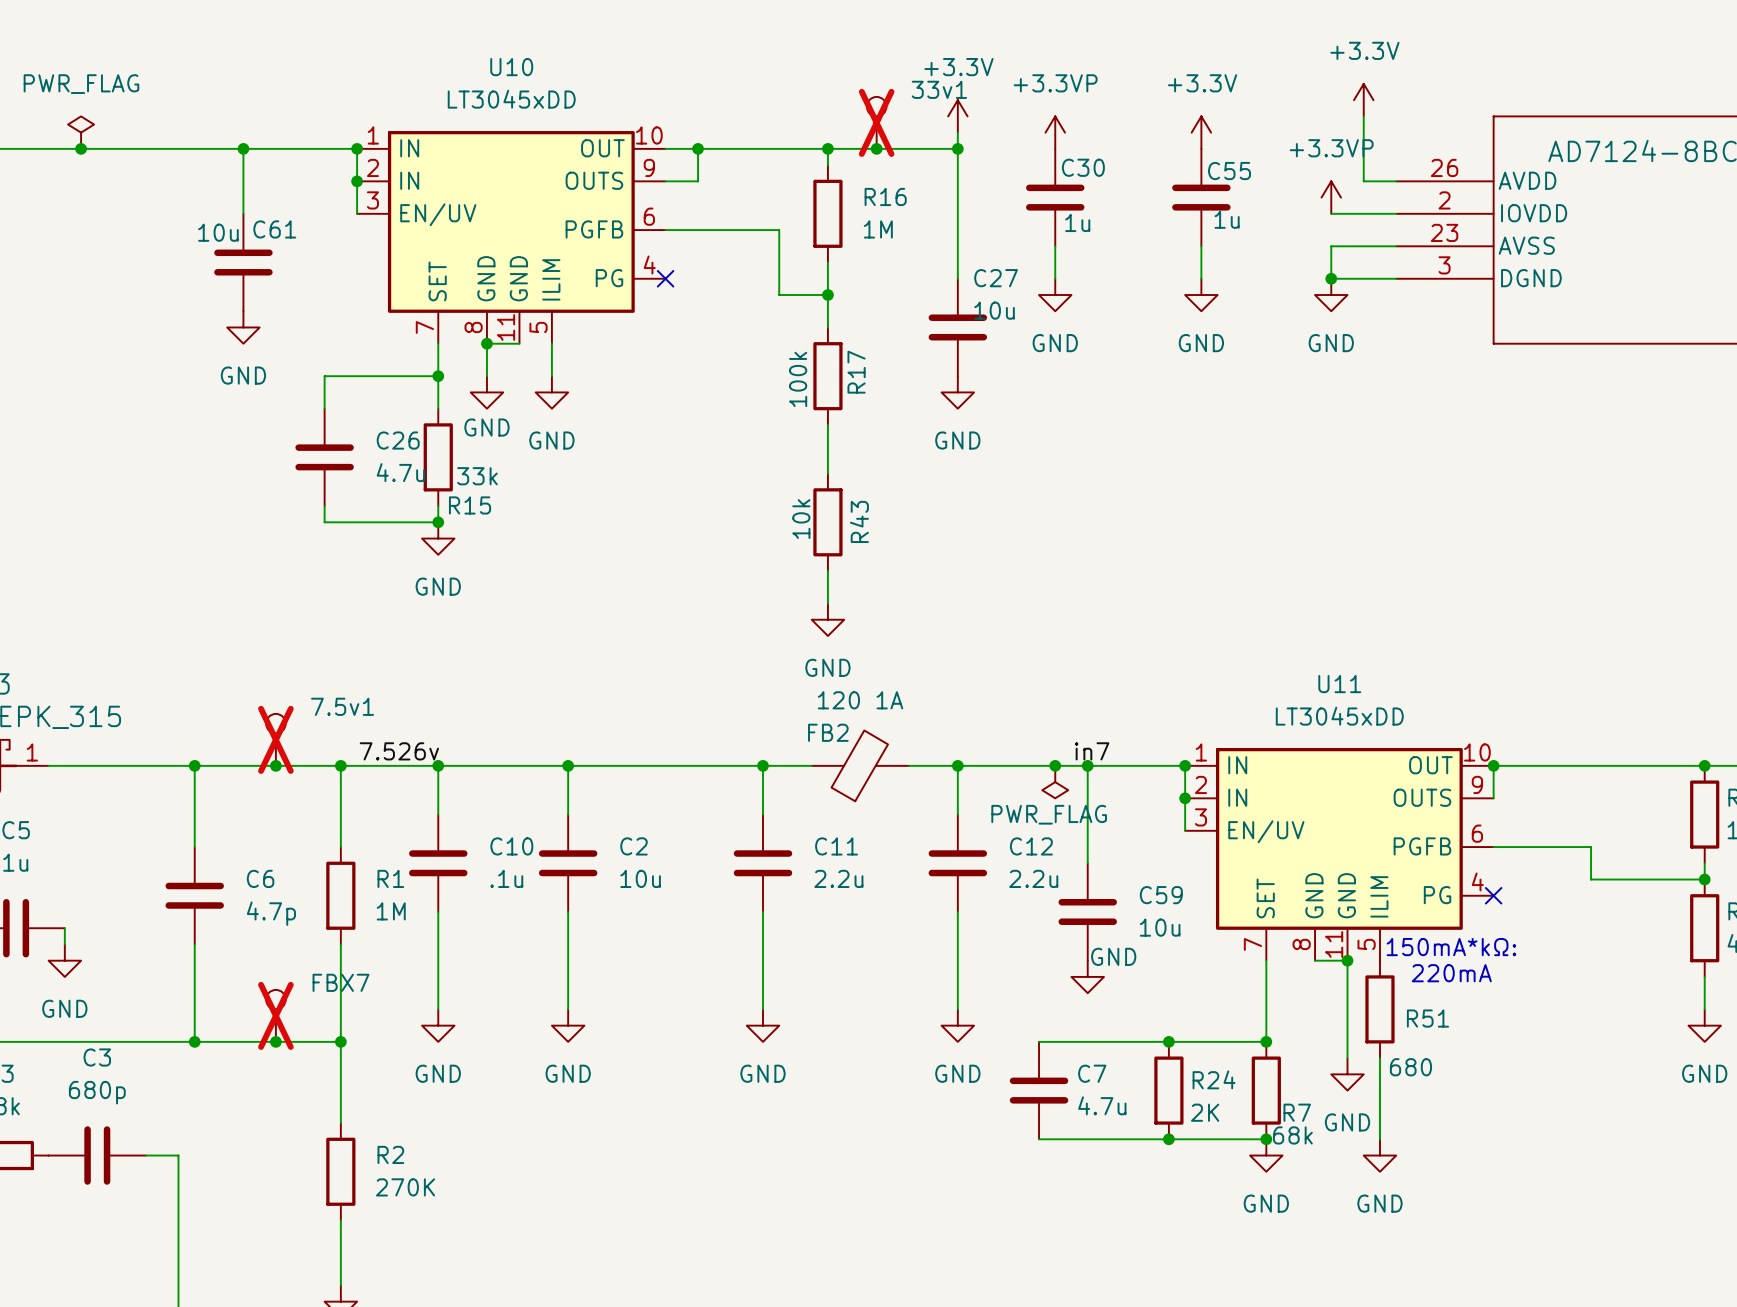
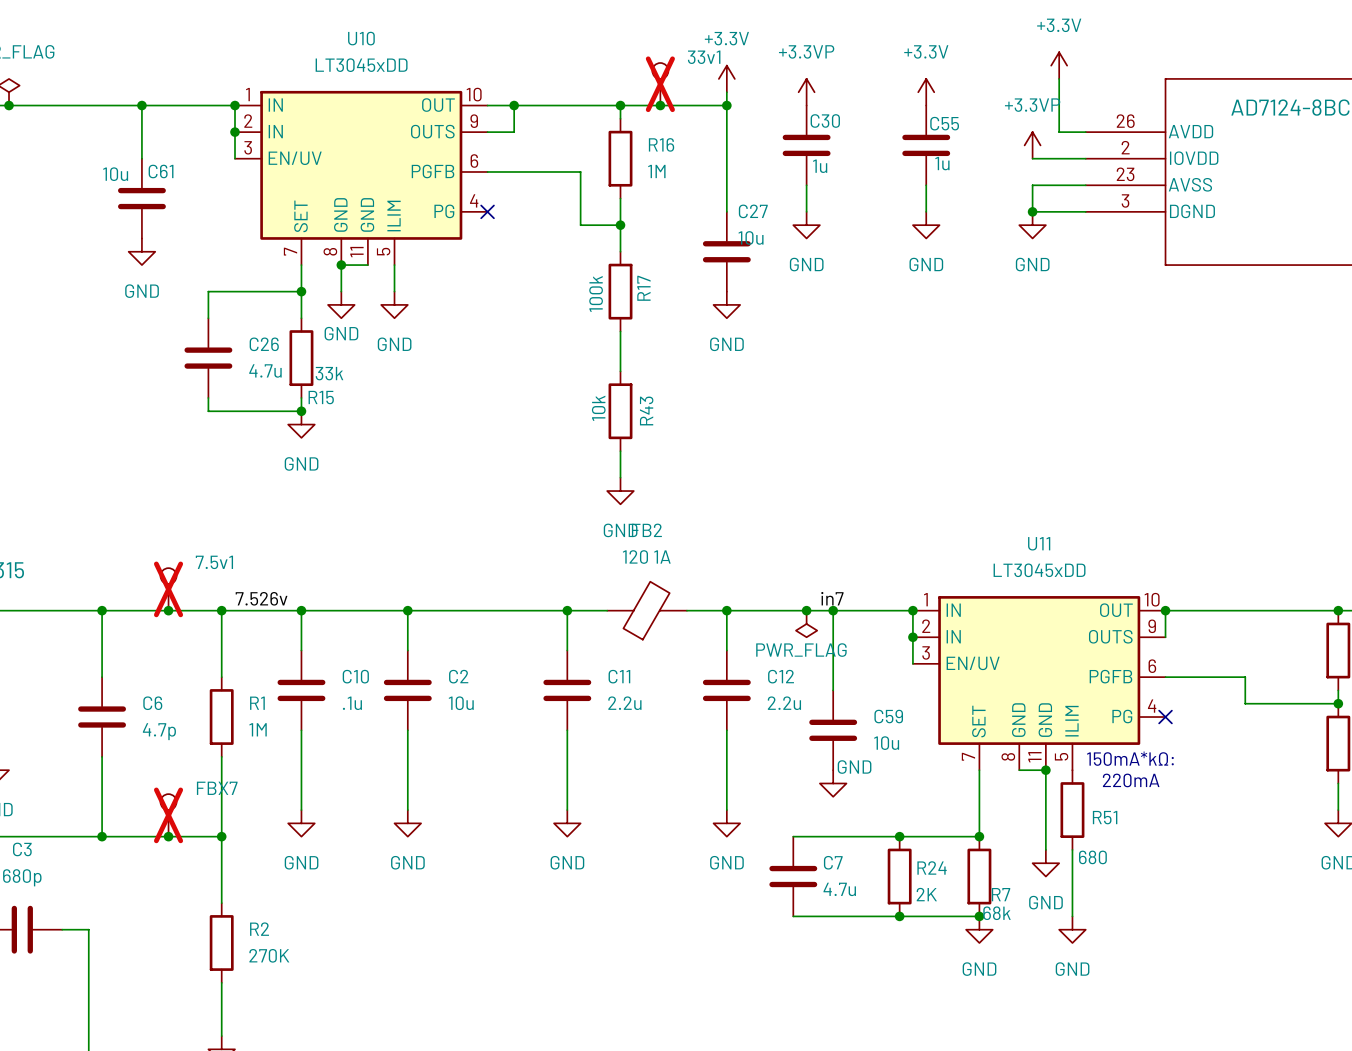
FB2 name position: FB2 (828, 732) -> FB2 (646, 530)

